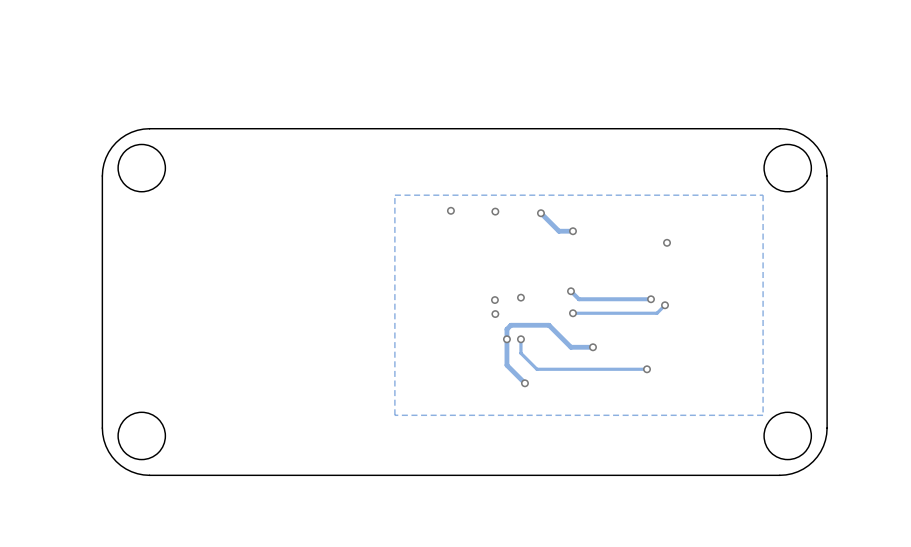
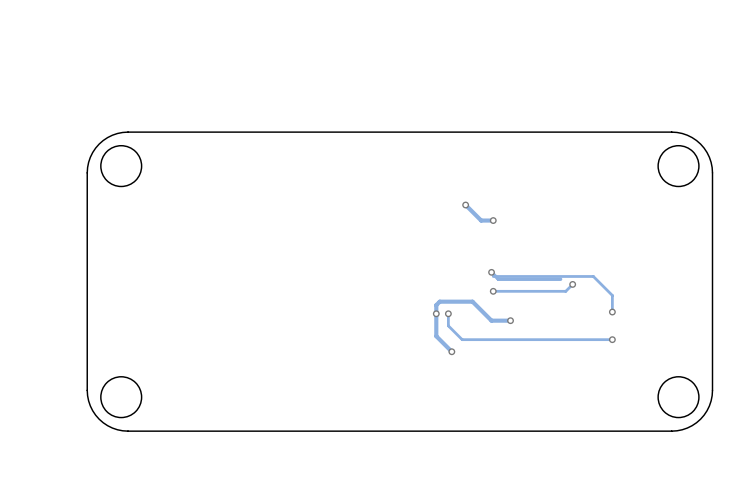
zone outline: (763, 195) (763, 415) (394, 415) (394, 195) (763, 195) -> none
via: (450, 210) -> none
via: (495, 211) -> none
via: (667, 242) -> none
track: none -> (493, 276) (593, 276) (612, 295) (612, 312)
via: (520, 297) -> none
via: (651, 299) -> none
via: (494, 300) -> none
via: (495, 314) -> none
via: none -> (612, 312)
via: (647, 369) -> none
track: none -> (612, 339) (557, 339)
via: none -> (612, 339)

